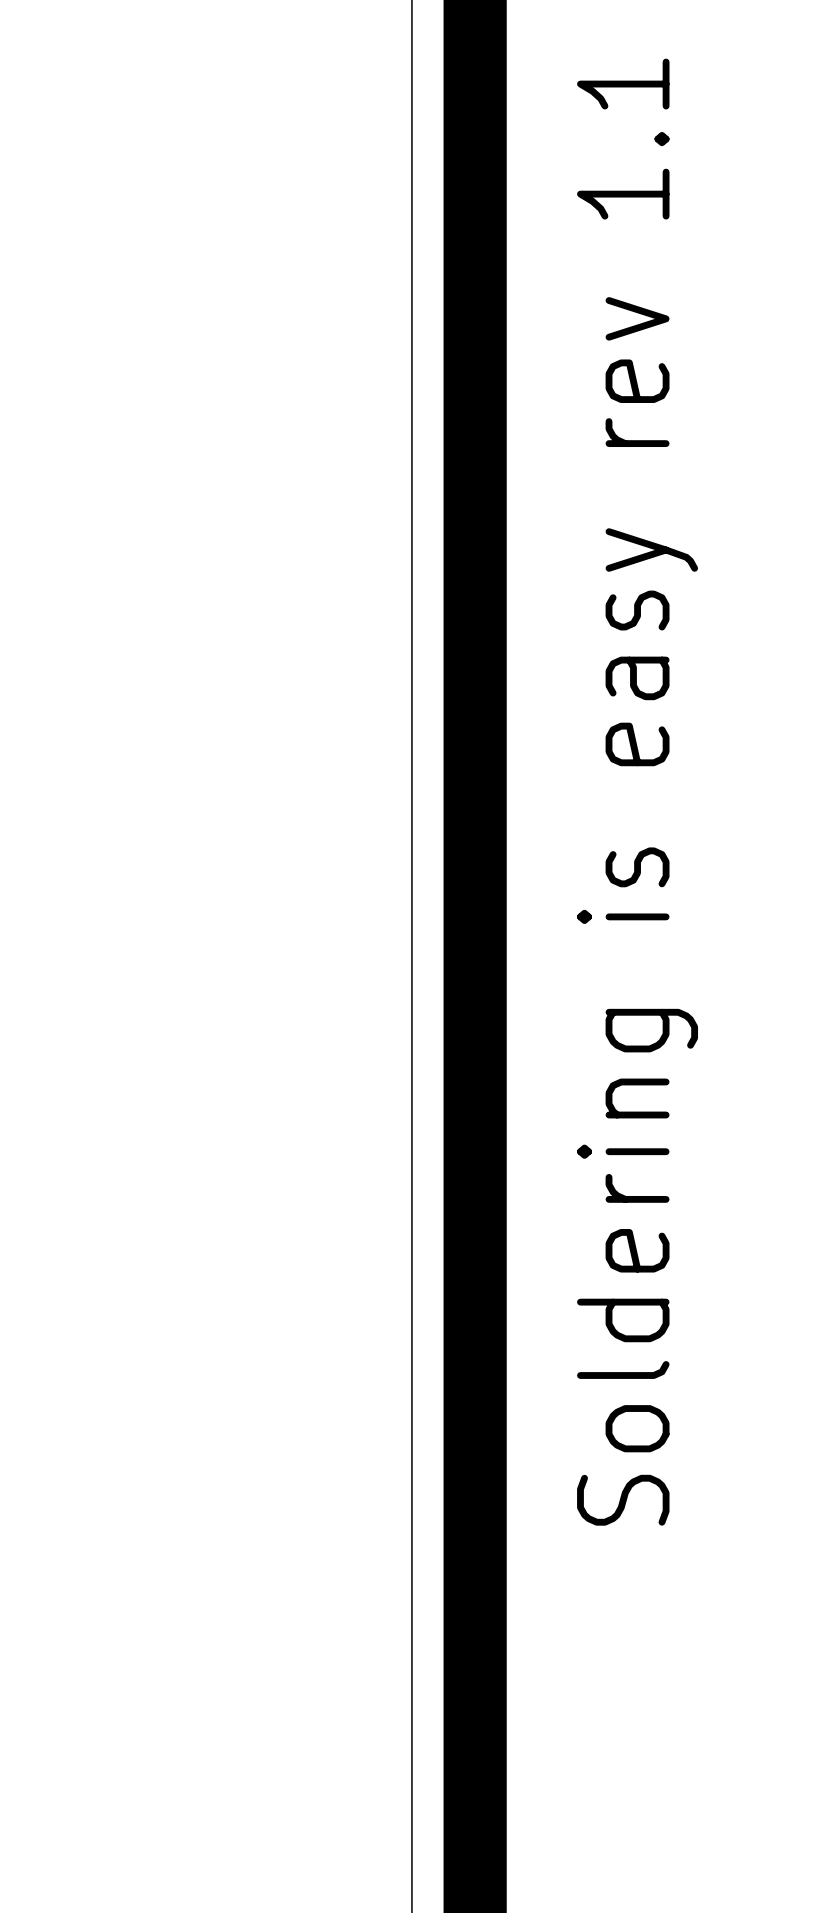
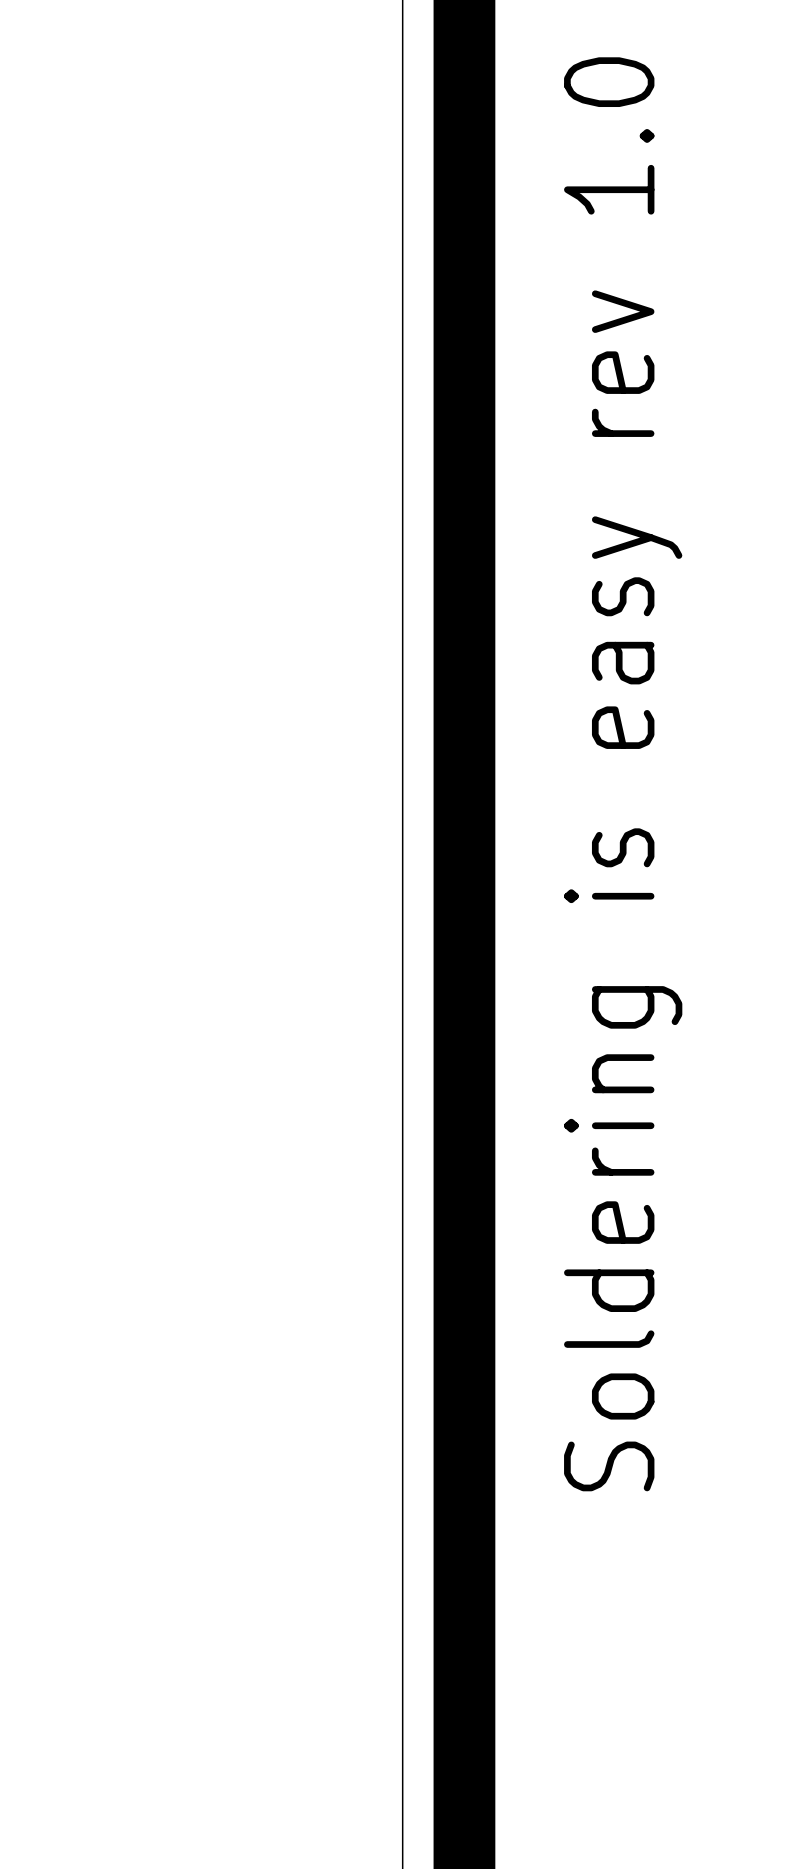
text: Soldering is easy rev 1.1 (637, 792) -> Soldering is easy rev 1.0 (623, 774)

